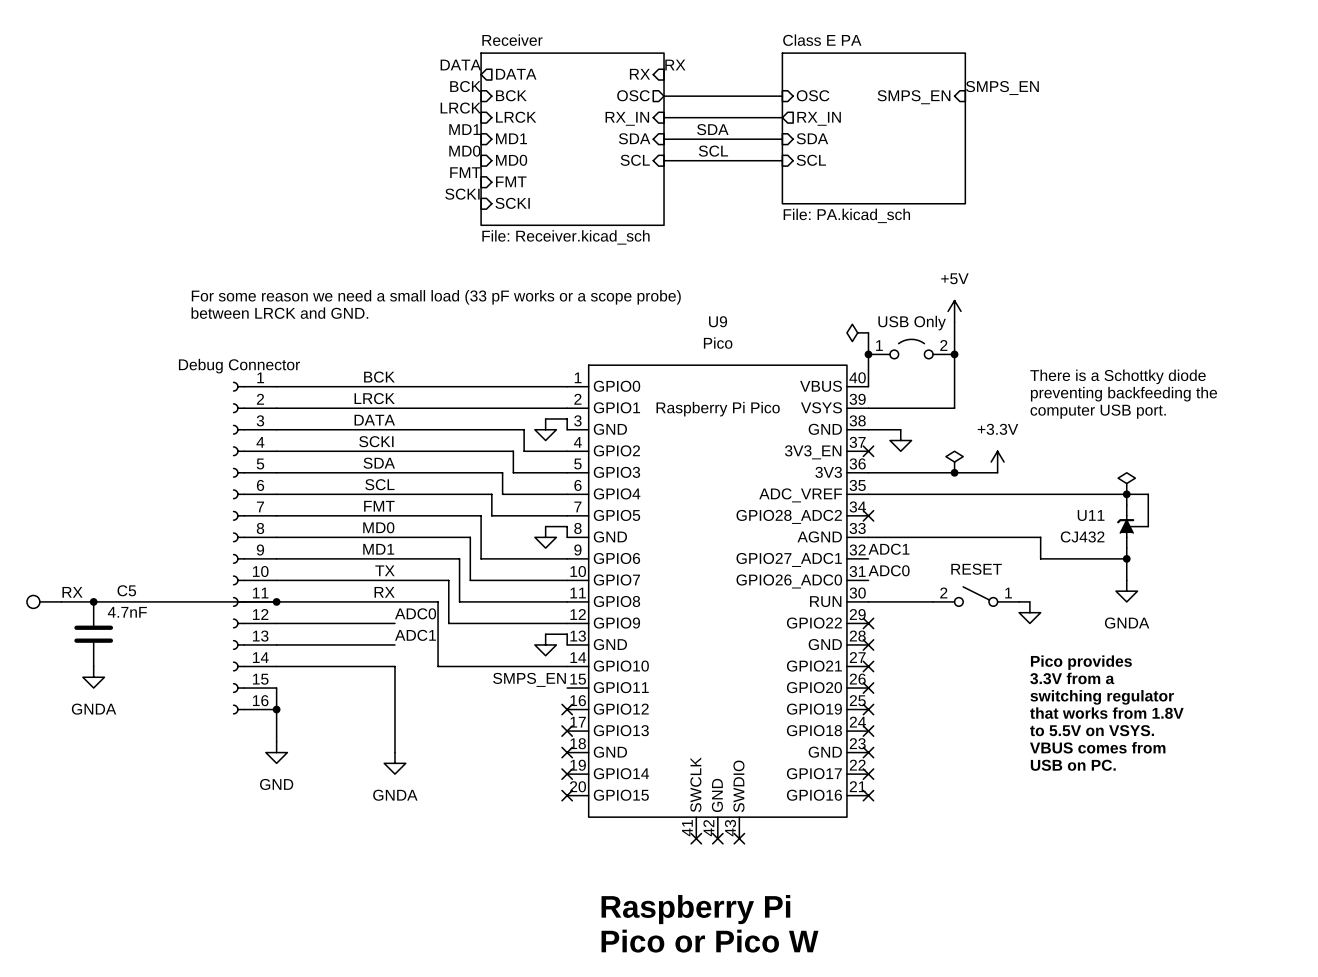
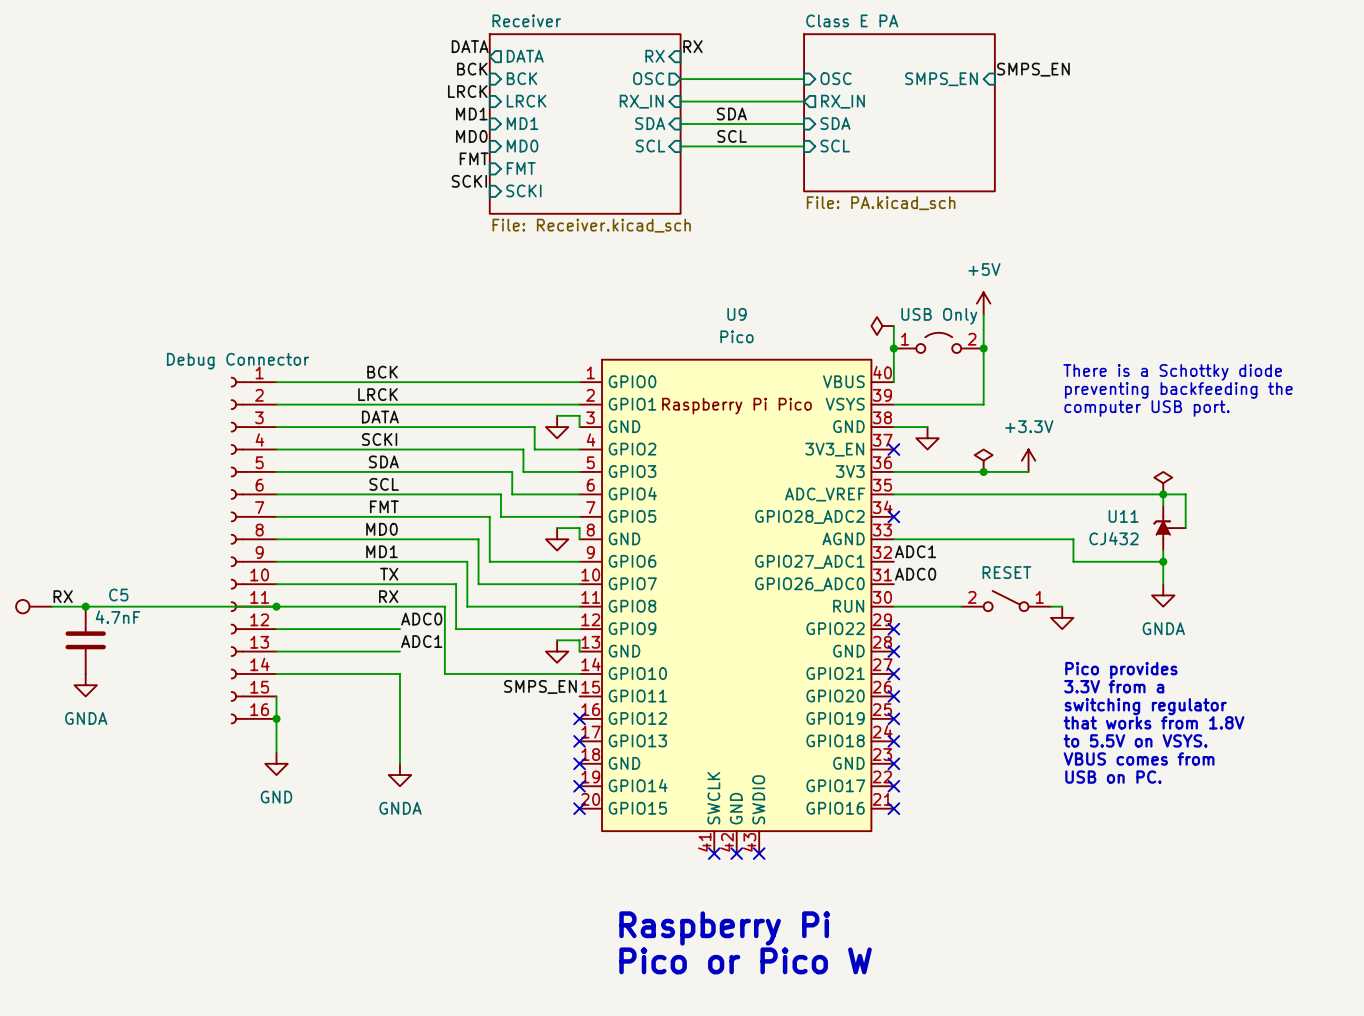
text: For some reason we need a small load (33 pF works or a scope probe) (436, 297) -> none
text: between LRCK and GND. (279, 313) -> none

